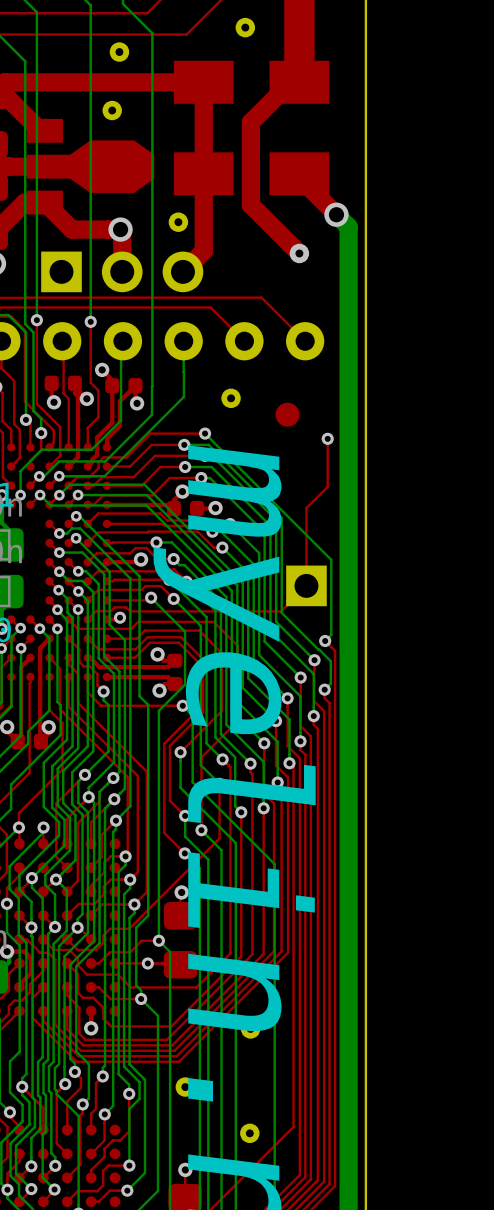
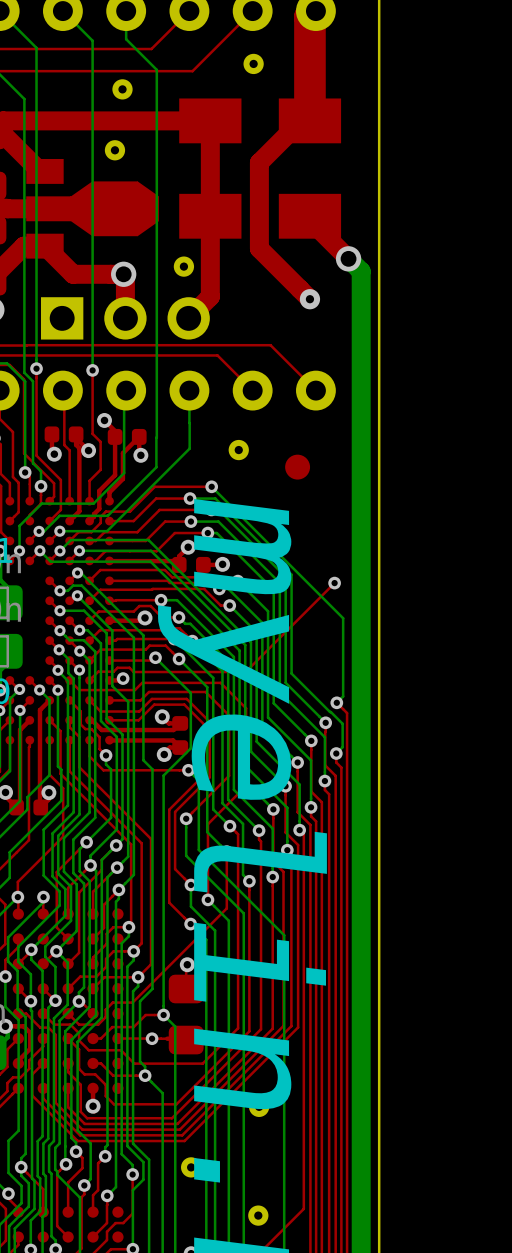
top track: (327, 438) (327, 486) (306, 508) (306, 585) (280, 611) (237, 611) -> (334, 583) (245, 672)
via position: (327, 438) -> (334, 583)
part: (306, 585) -> none

